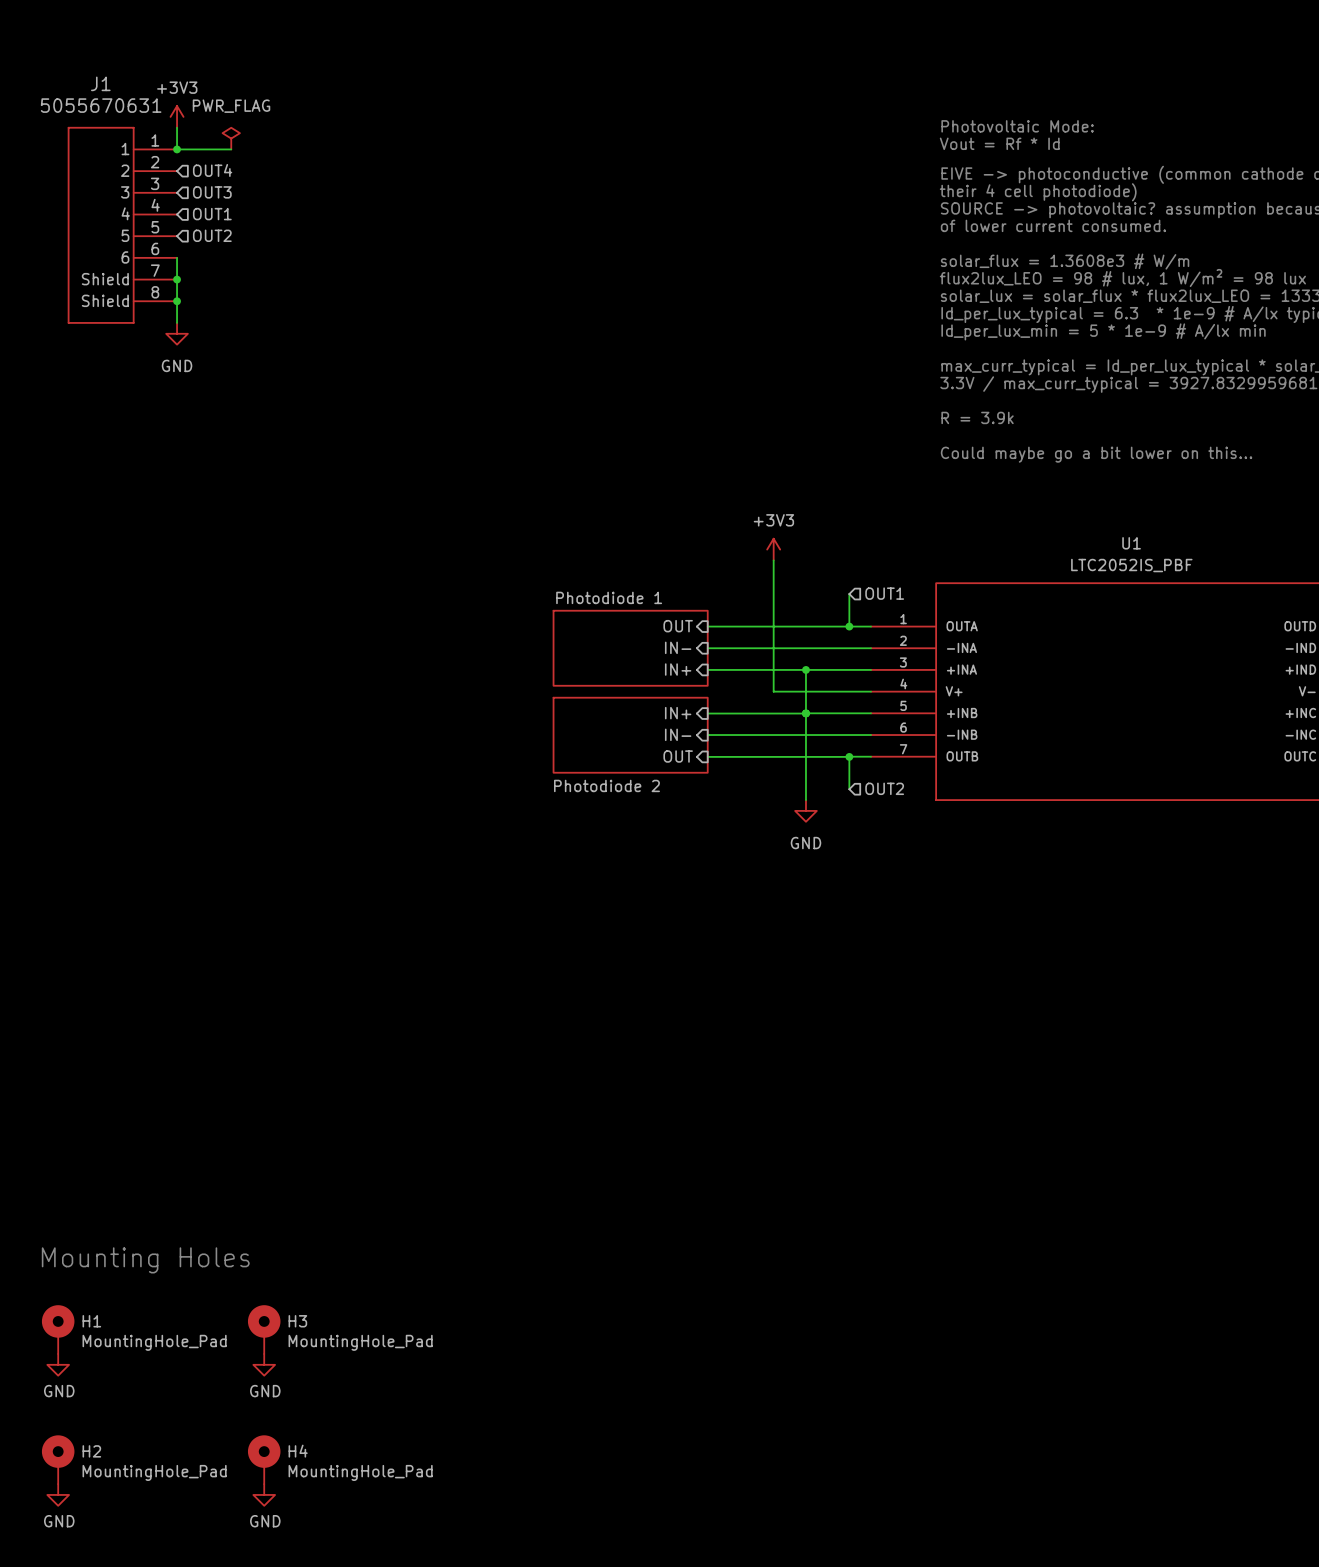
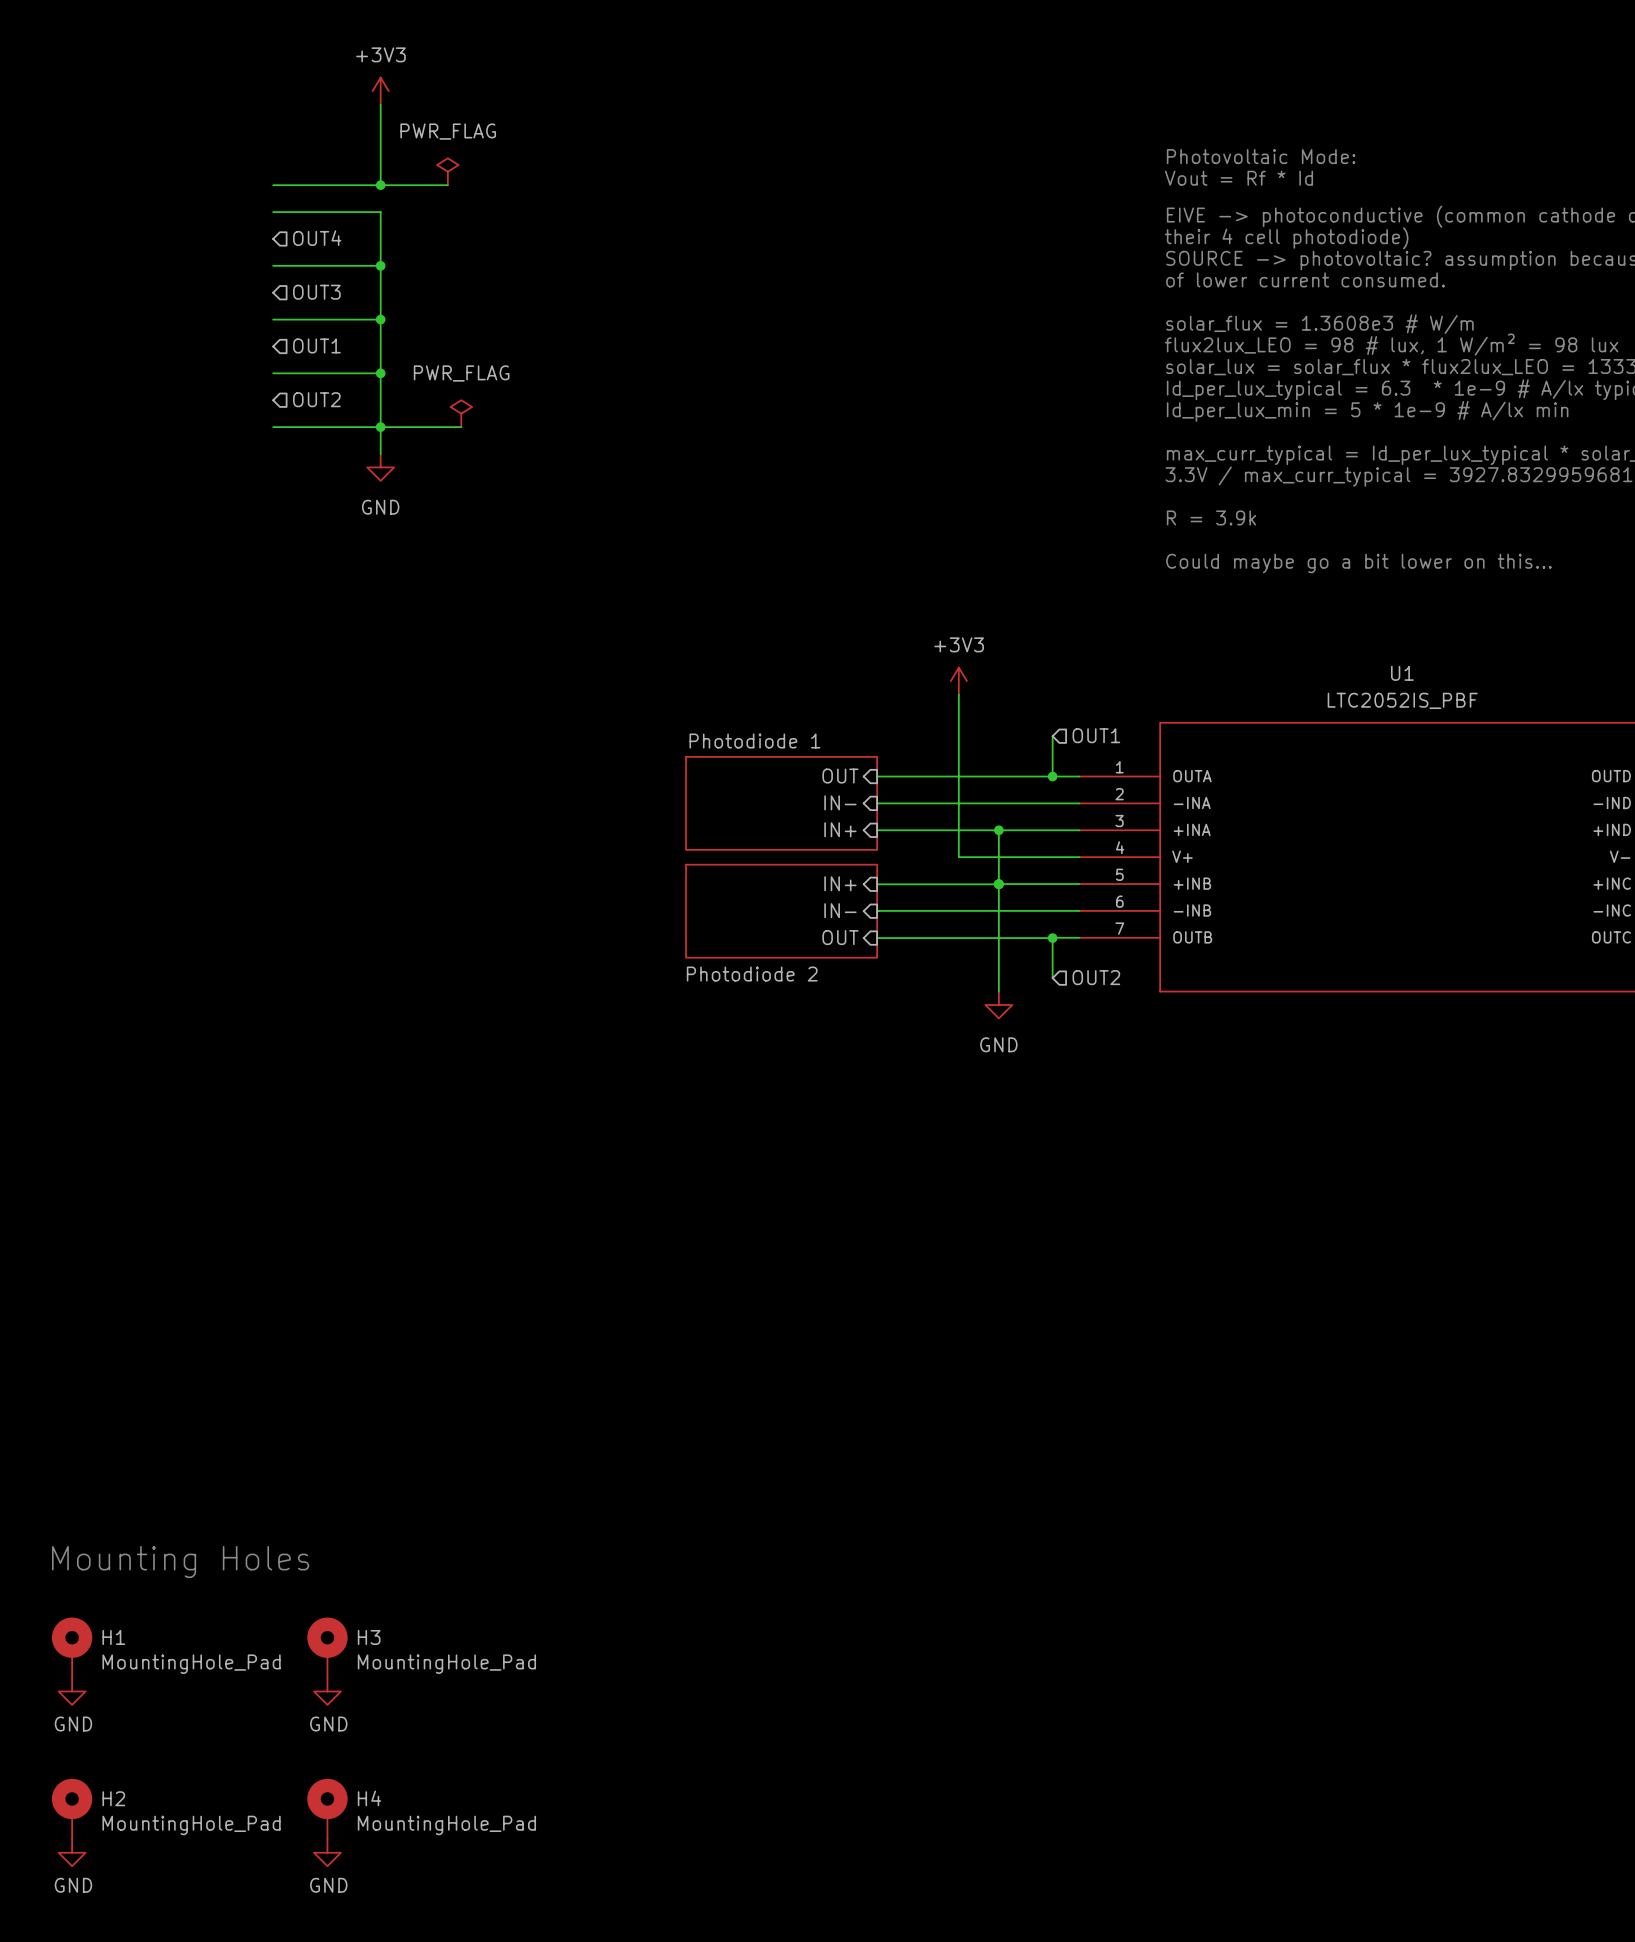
wire: none -> (380, 104) (380, 185)
power symbol position: +3V3 (177, 116) -> +3V3 (380, 91)
wire: (177, 127) (177, 149) (220, 149) -> none
power symbol: PWR_FLAG (231, 138) -> none
power symbol: none -> PWR_FLAG (447, 171)
junction: (177, 149) -> none
wire: none -> (286, 185) (447, 185)
junction: none -> (380, 185)
hierarchical label position: OUT4 (212, 170) -> OUT4 (317, 238)
wire: none -> (273, 212) (380, 212) (380, 453)
hierarchical label position: OUT3 (212, 192) -> OUT3 (316, 292)
hierarchical label position: OUT1 (212, 214) -> OUT1 (316, 345)
wire: none -> (273, 265) (380, 265)
junction: none -> (380, 265)
J1: 5055670631 (122, 225) -> none
hierarchical label position: OUT2 (212, 235) -> OUT2 (316, 399)
wire: (177, 257) (177, 322) -> none
wire: none -> (273, 319) (380, 319)
junction: none -> (380, 319)
junction: (177, 279) -> none
junction: (177, 301) -> none
wire: none -> (273, 373) (380, 373)
junction: none -> (380, 373)
power symbol position: GND (177, 333) -> GND (380, 467)
power symbol: none -> PWR_FLAG (461, 413)
wire: none -> (273, 427) (461, 427)
junction: none -> (380, 427)

